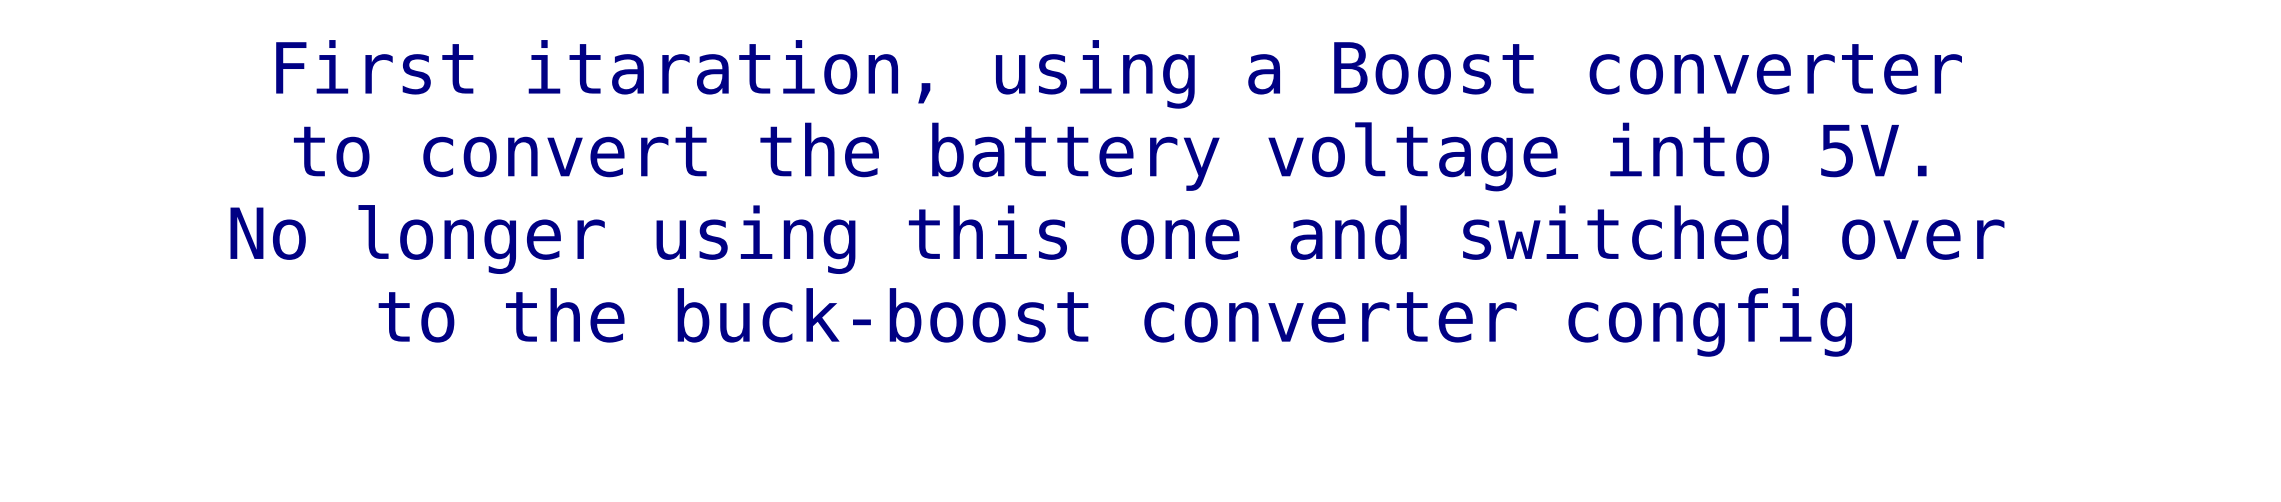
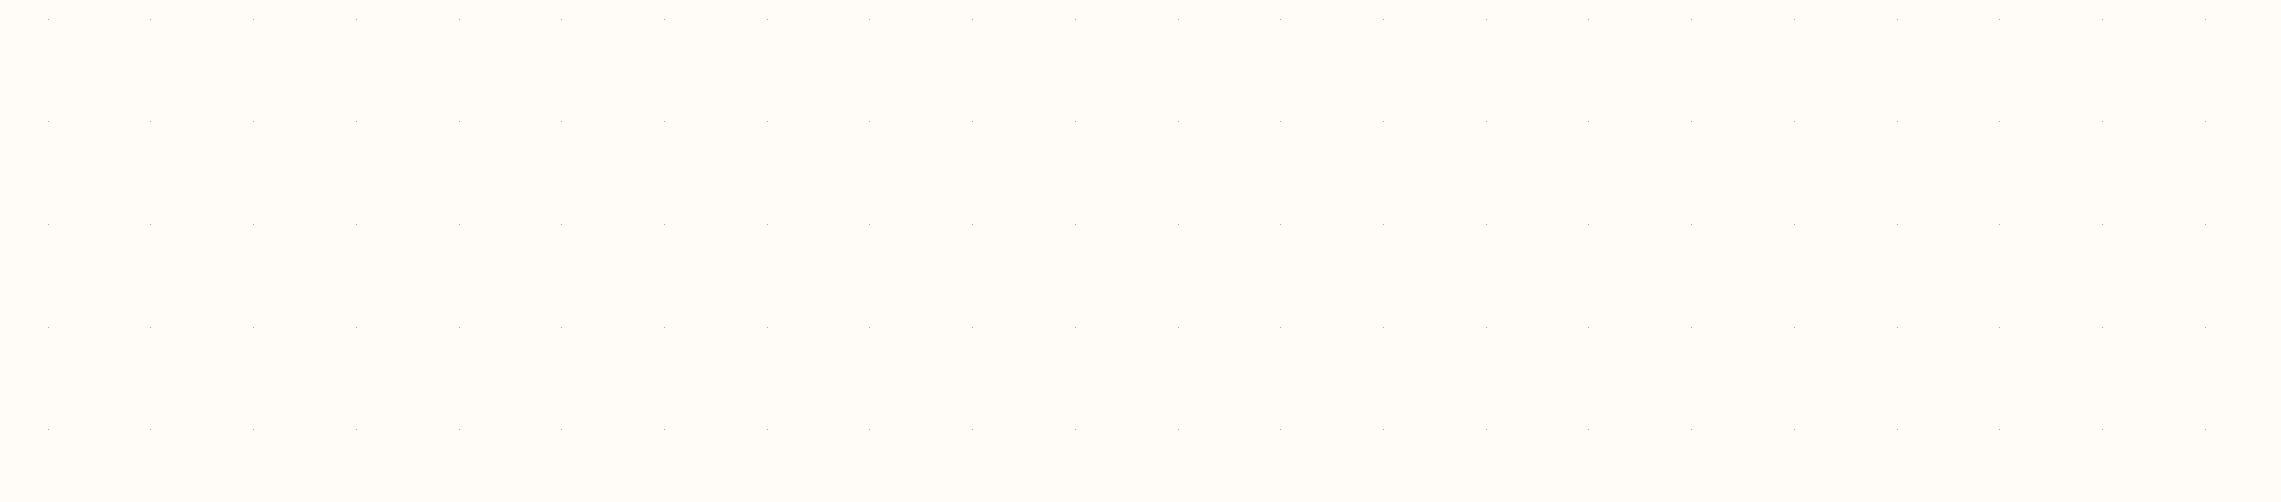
text: First itaration, using a Boost converter (1119, 74) -> none
text: to convert the battery voltage into 5V. (1110, 156) -> none
text: No longer using this one and switched over (1117, 239) -> none
text: to the buck-boost converter congfig (1115, 322) -> none

